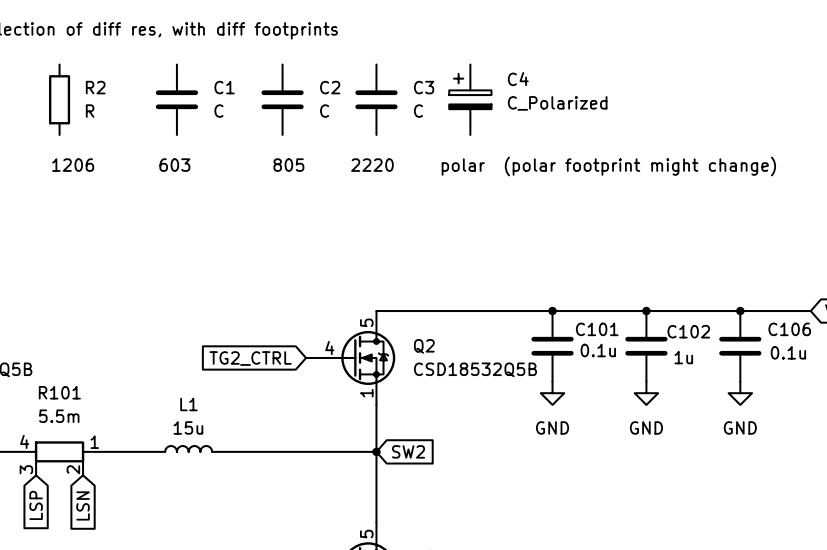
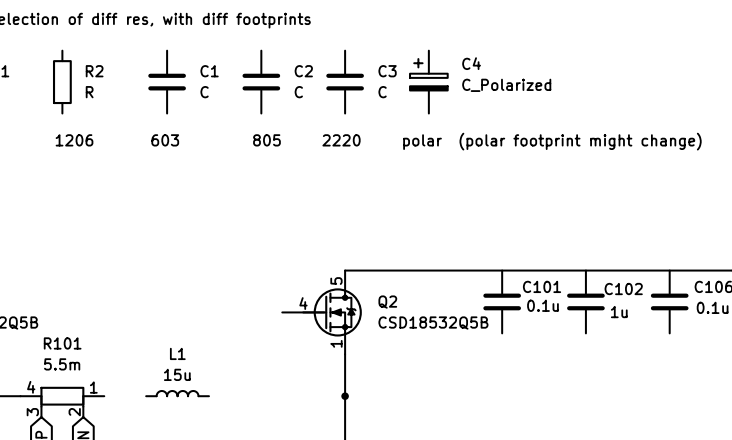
junction: (552, 311) -> none
junction: (646, 311) -> none
junction: (740, 311) -> none
global label: TG2_CTRL (250, 358) -> none
power symbol: GND (552, 393) -> none
power symbol: GND (646, 393) -> none
power symbol: GND (740, 393) -> none
wire: (106, 451) (153, 451) -> none
wire: (223, 451) (376, 451) -> none
global label: SW2 (408, 451) -> none

